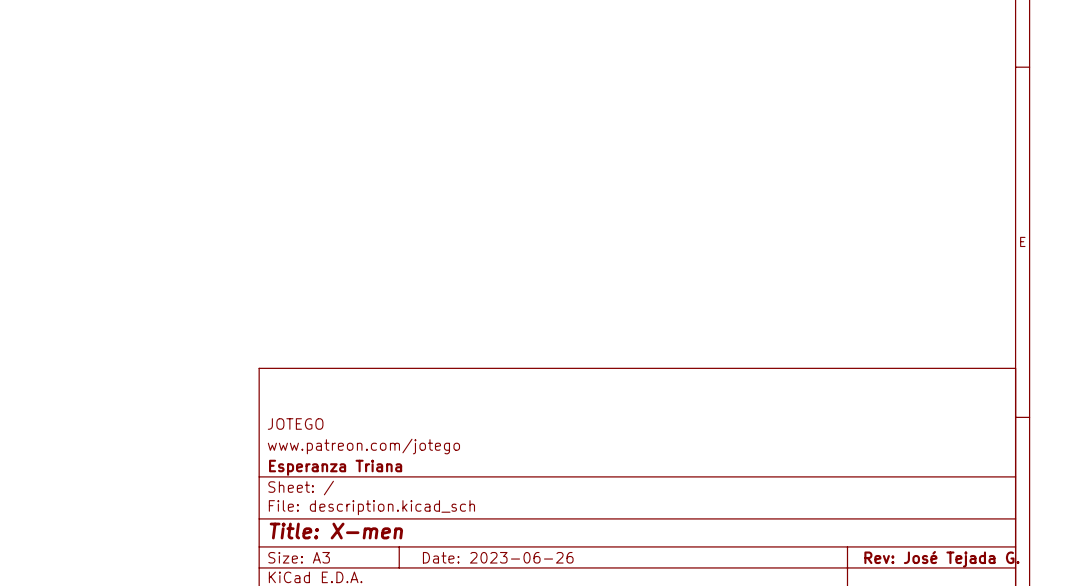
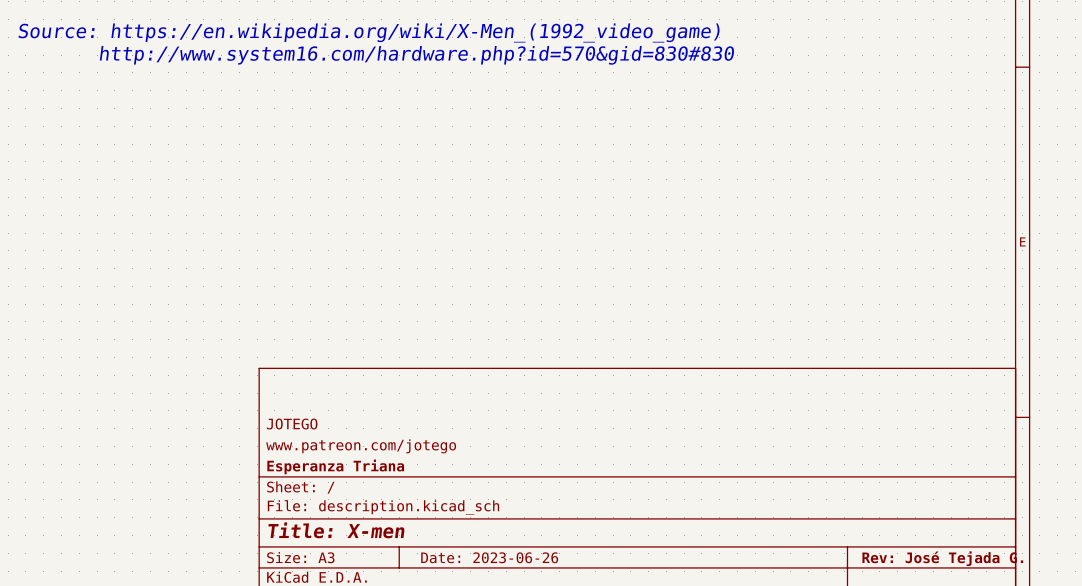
text: none -> Source: https://en.wikipedia.org/wiki/X-Men_(1992_video_game) (369, 32)
text: none -> http://www.system16.com/hardware.php?id=570&gid=830#830 (417, 55)

